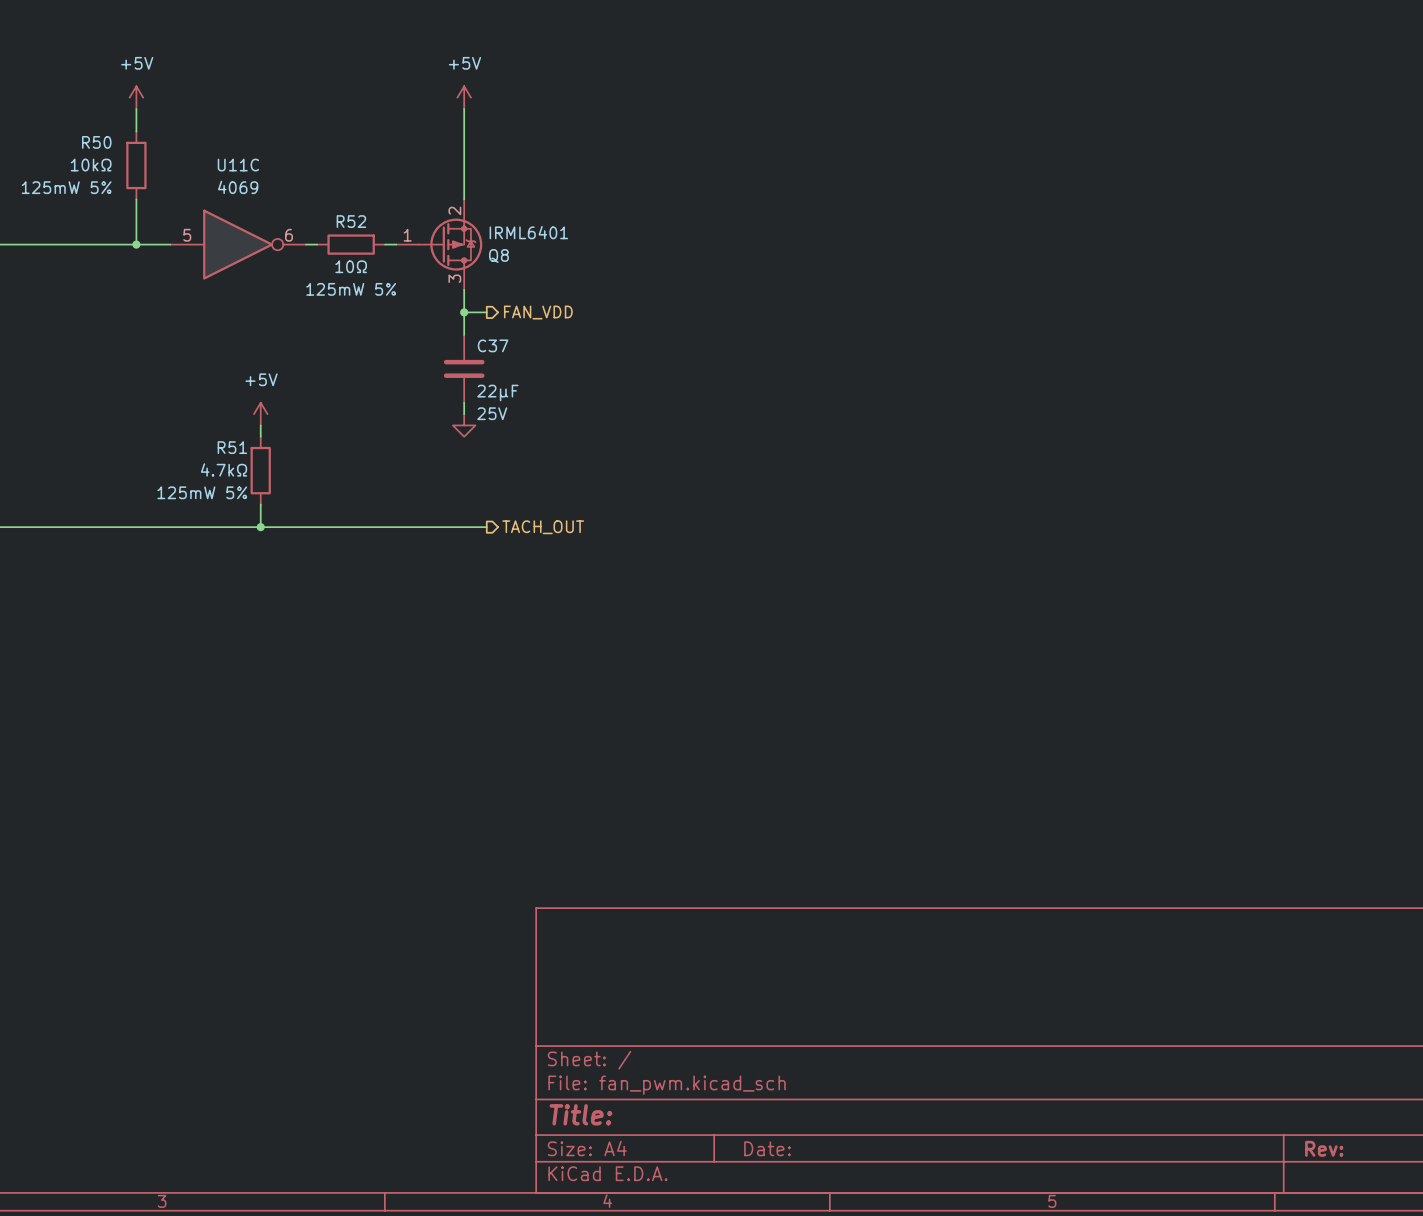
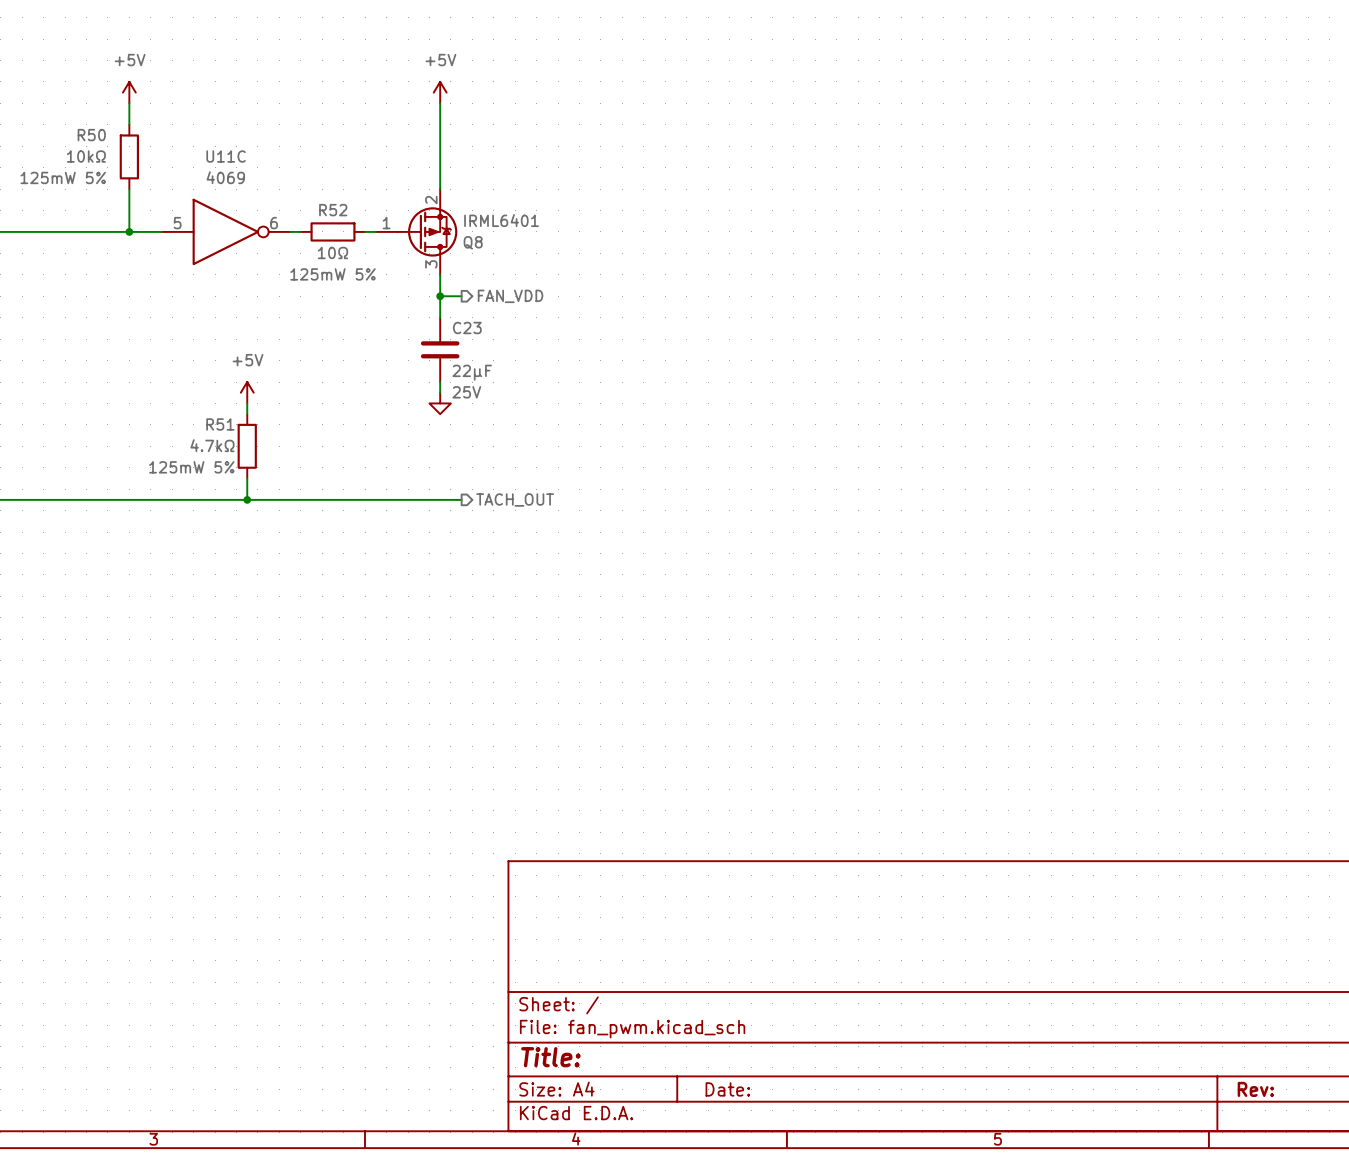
C37 name: C37 (493, 345) -> C23 (467, 328)

